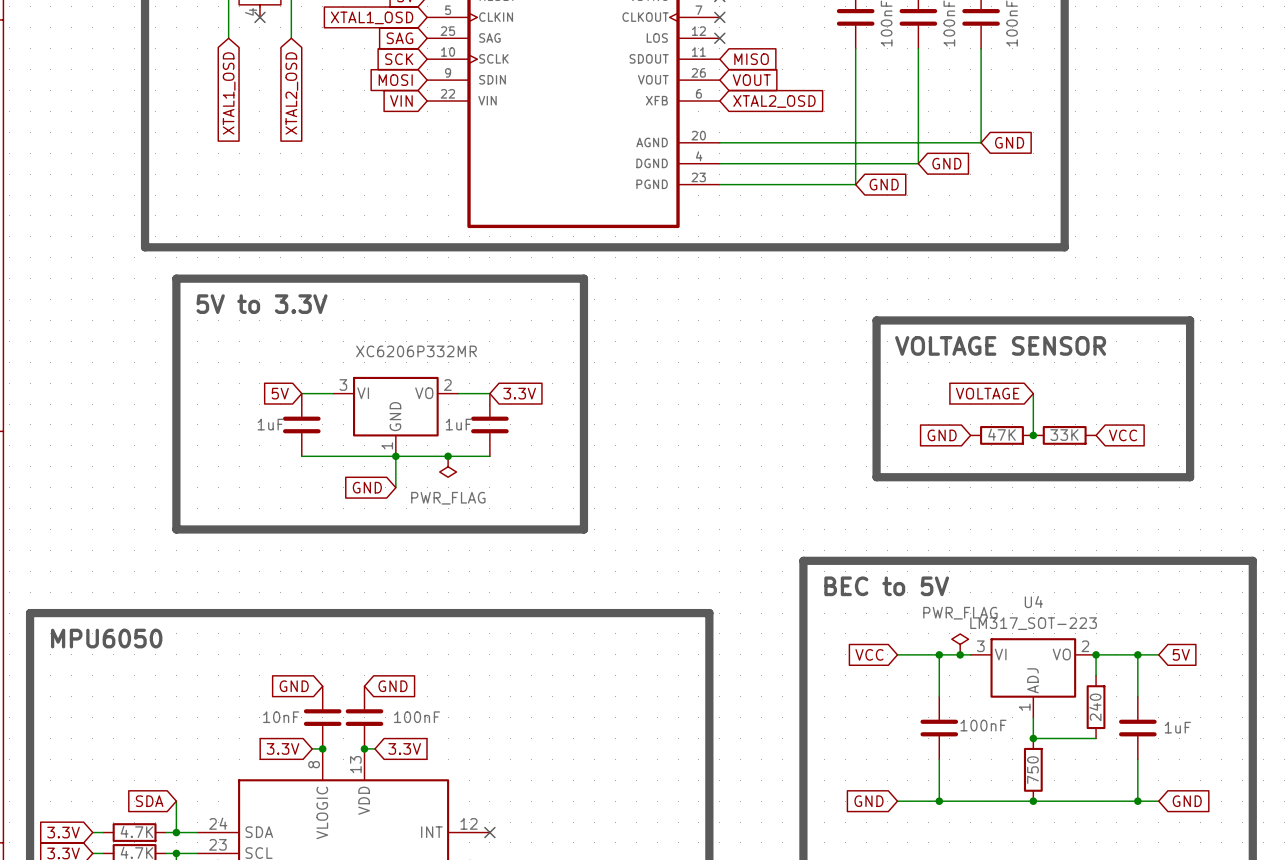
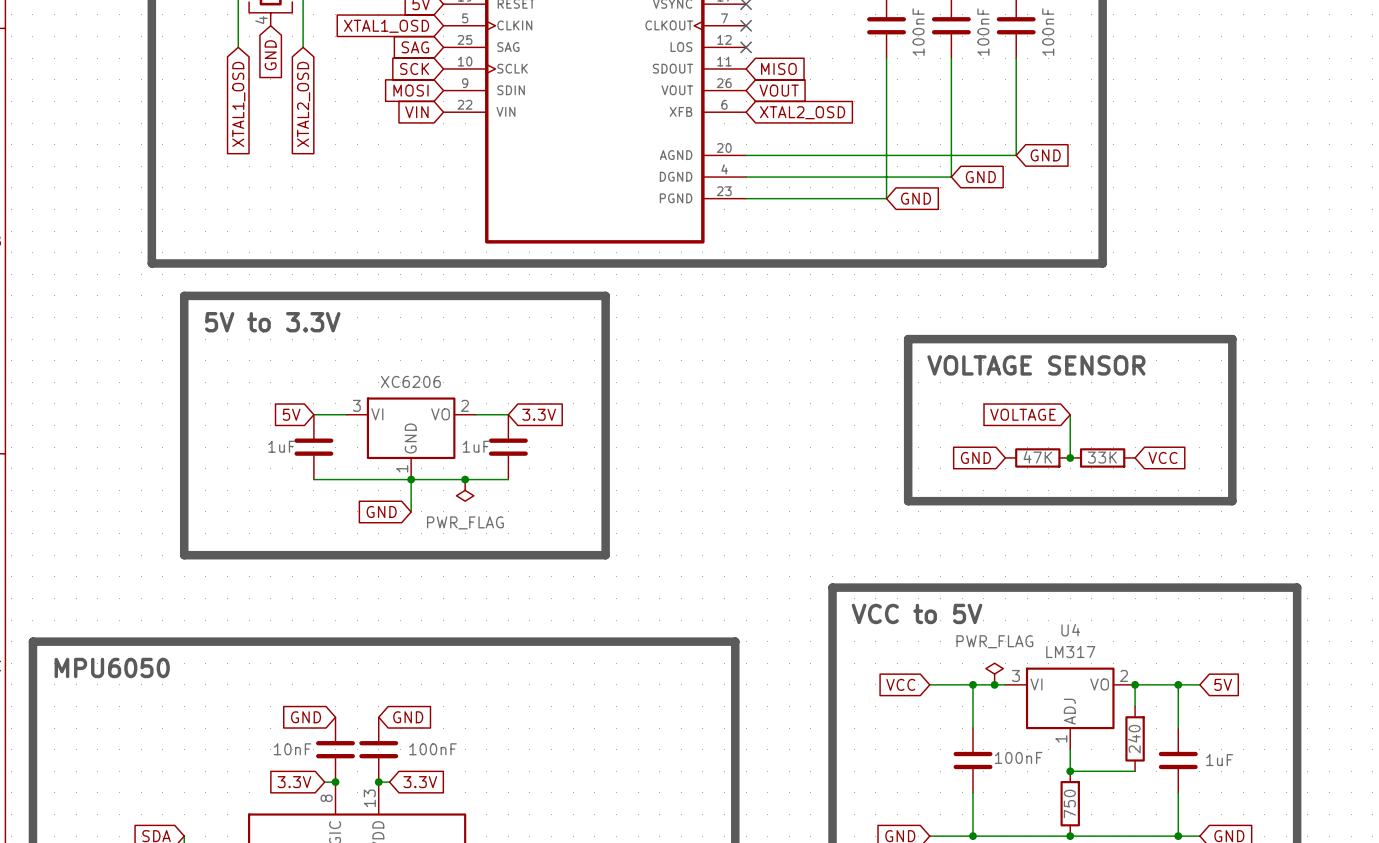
no-connect mark: (259, 17) -> none
global label: none -> GND (270, 55)
part value: XC6206P332MR (416, 351) -> XC6206 (410, 381)
text: BEC to 5V (886, 586) -> VCC to 5V (917, 613)
U4 value: LM317_SOT-223 (1033, 623) -> LM317 (1070, 652)

